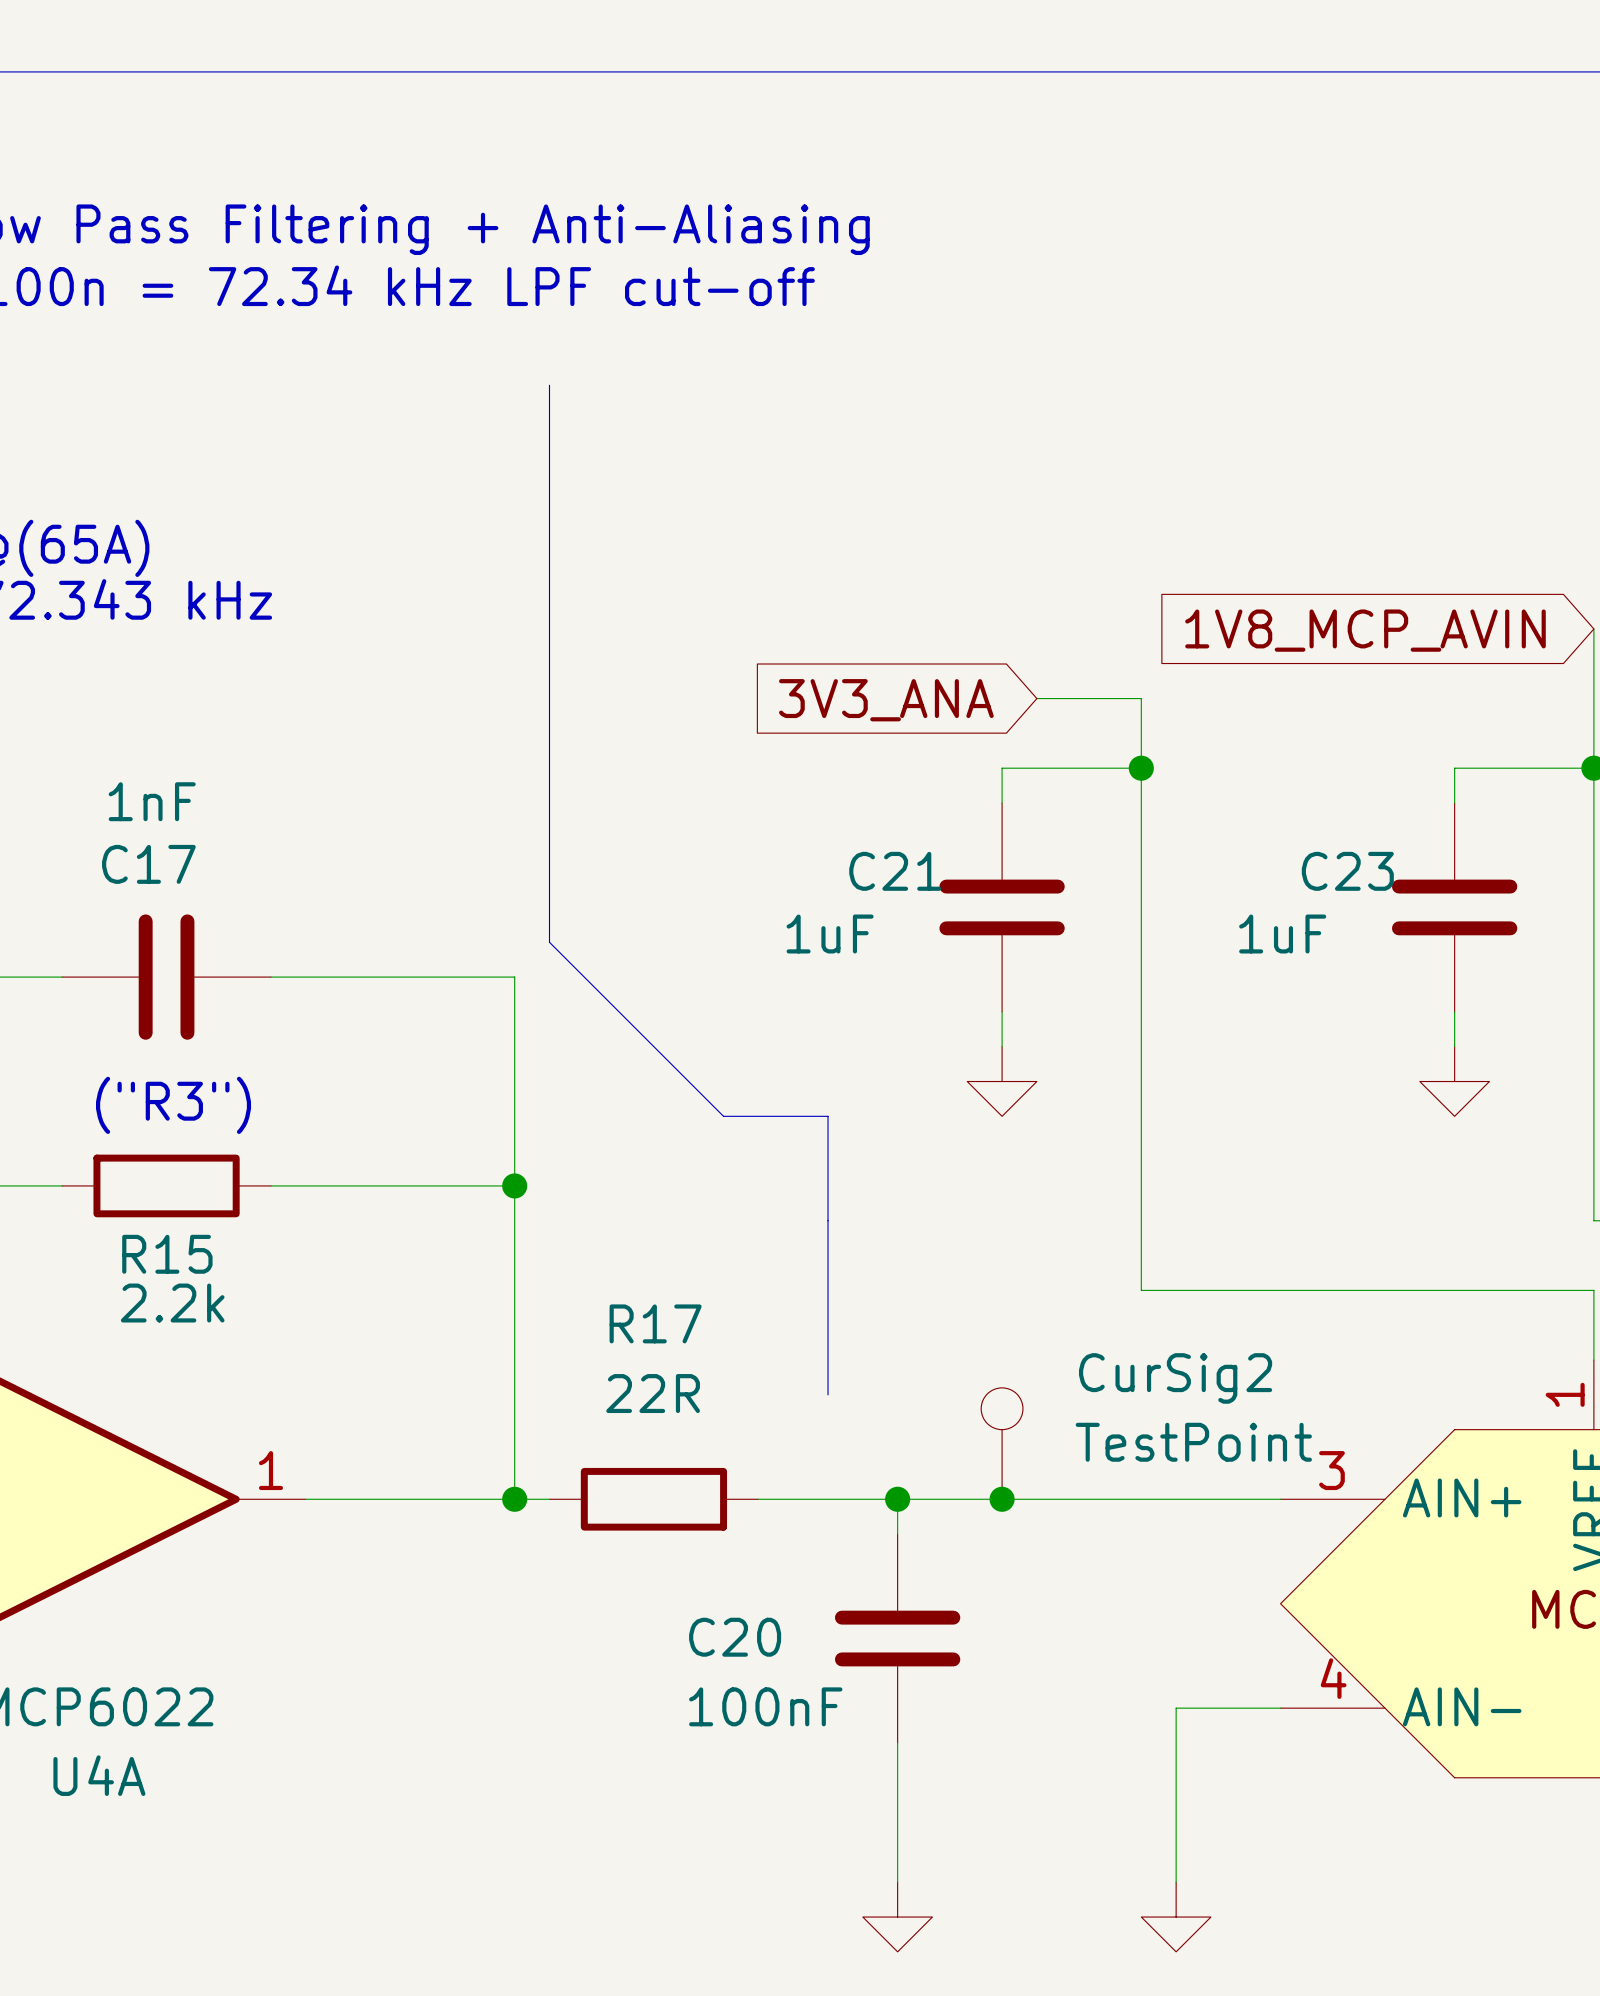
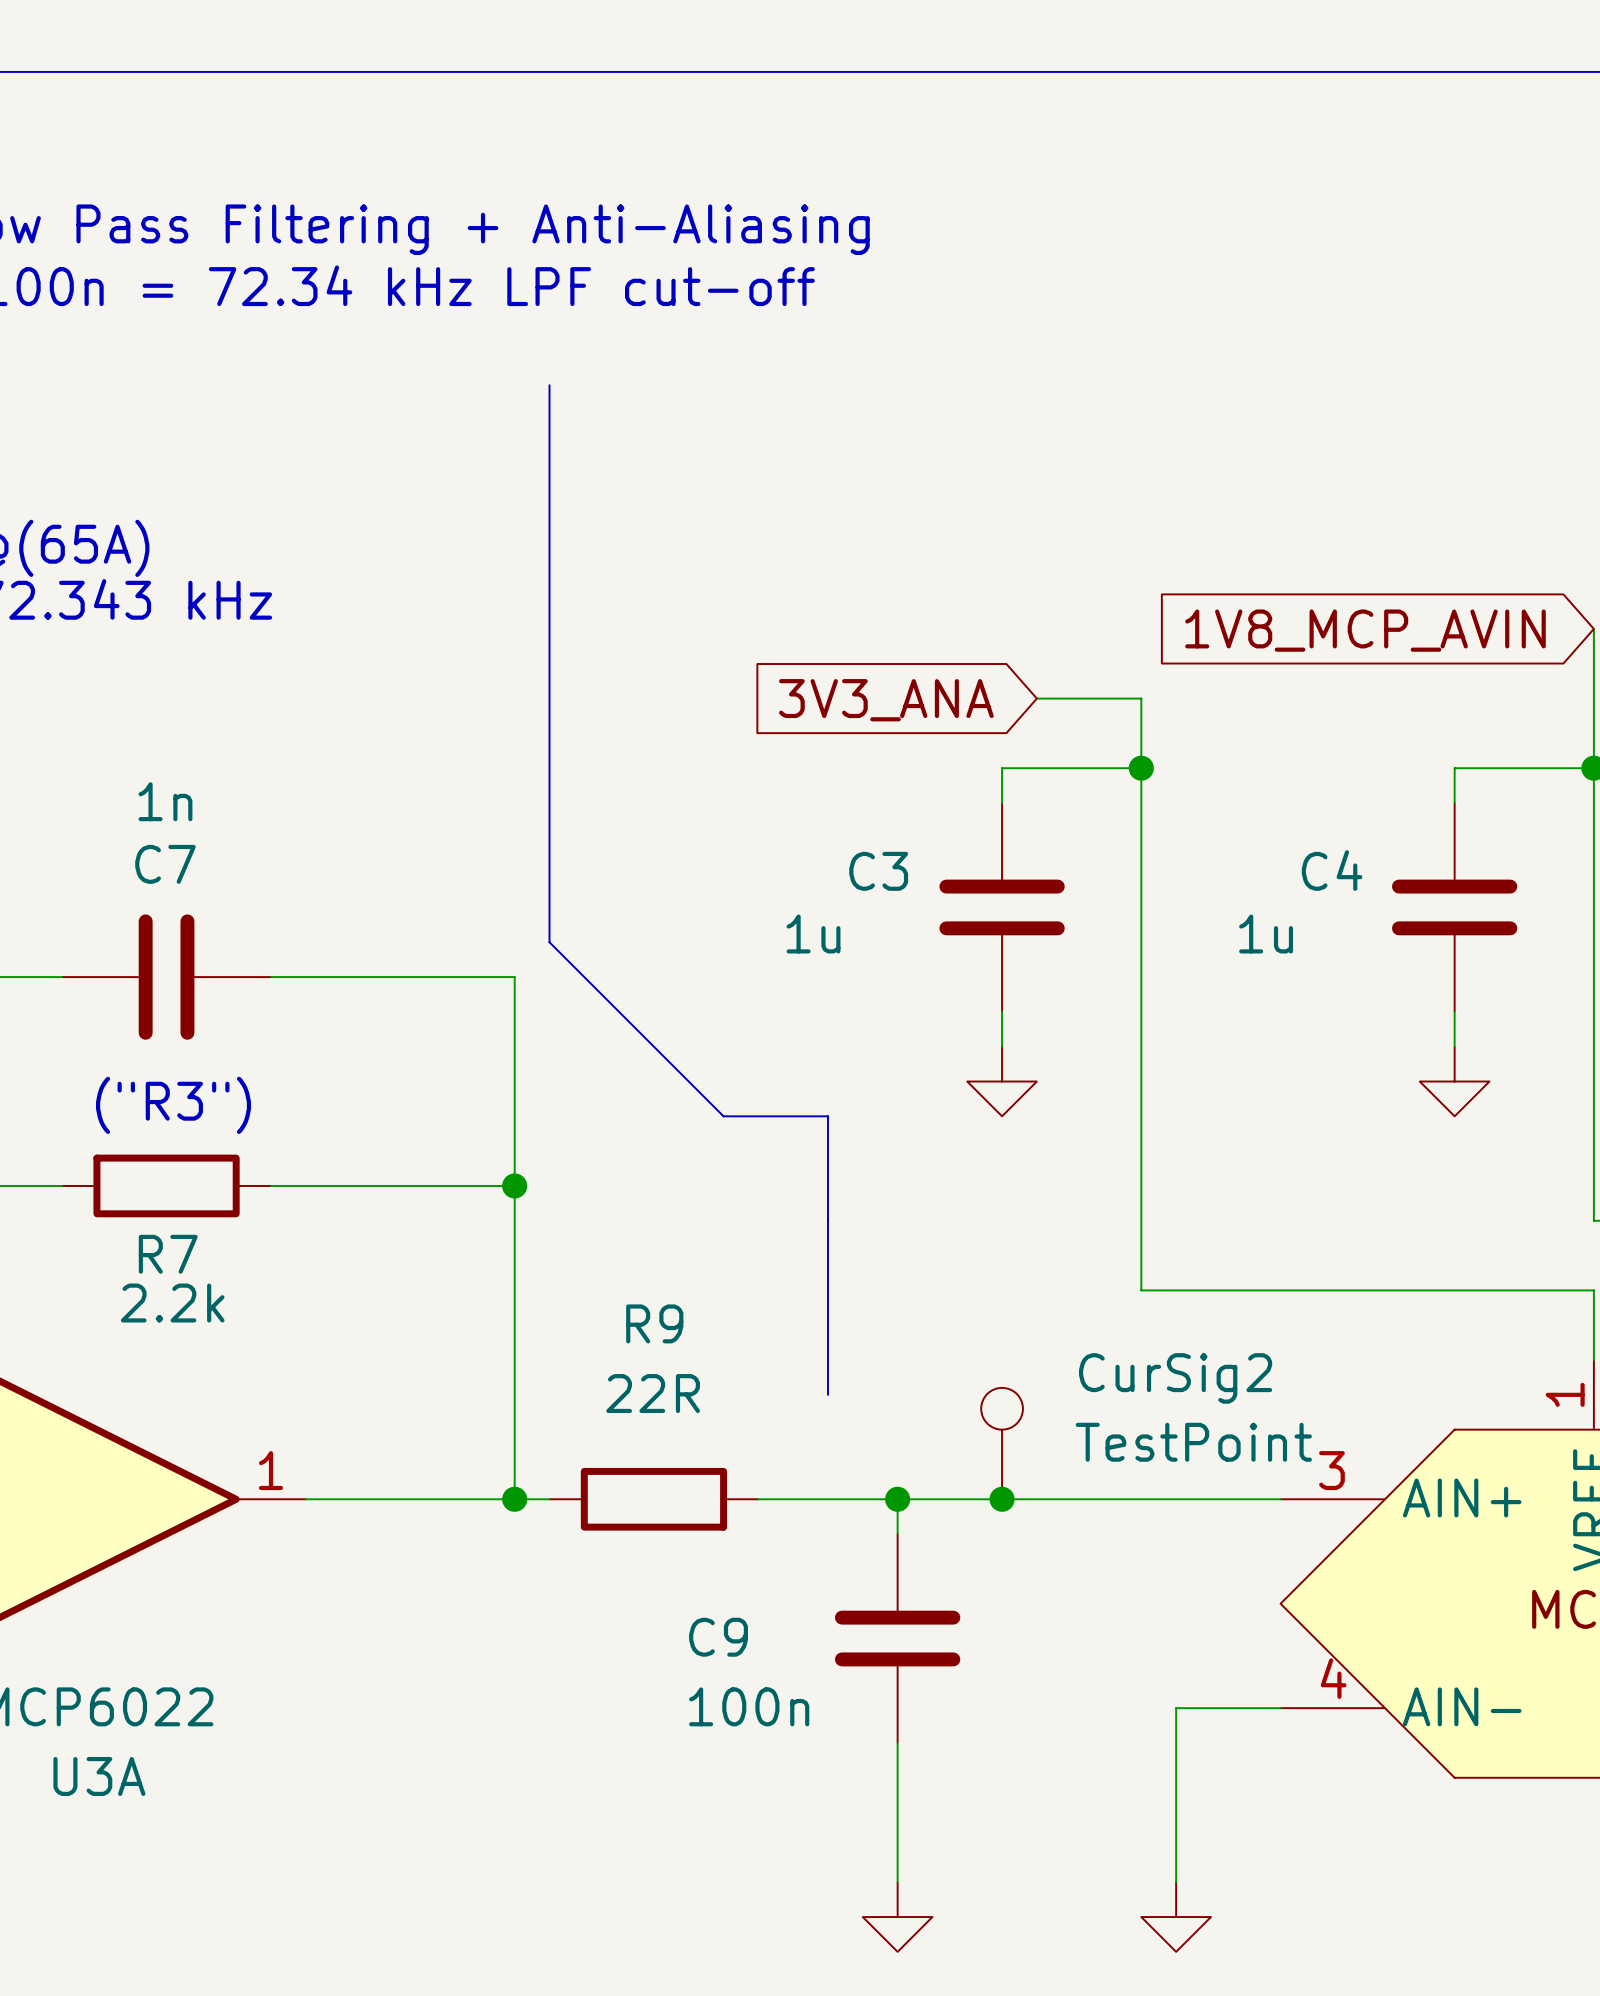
C17 value: 1nF (152, 801) -> 1n (165, 801)
C17 name: C17 (148, 864) -> C7 (165, 864)
C21 name: C21 (895, 871) -> C3 (878, 871)
C23 name: C23 (1347, 871) -> C4 (1332, 870)
C21 value: 1uF (830, 934) -> 1u (813, 934)
C23 value: 1uF (1282, 934) -> 1u (1266, 934)
R15 name: R15 (167, 1254) -> R7 (168, 1254)
R17 name: R17 (655, 1323) -> R9 (654, 1323)
C20 name: C20 (735, 1637) -> C9 (718, 1637)
C20 value: 100nF (765, 1706) -> 100n (749, 1706)
U4A name: U4A (99, 1775) -> U3A (99, 1776)

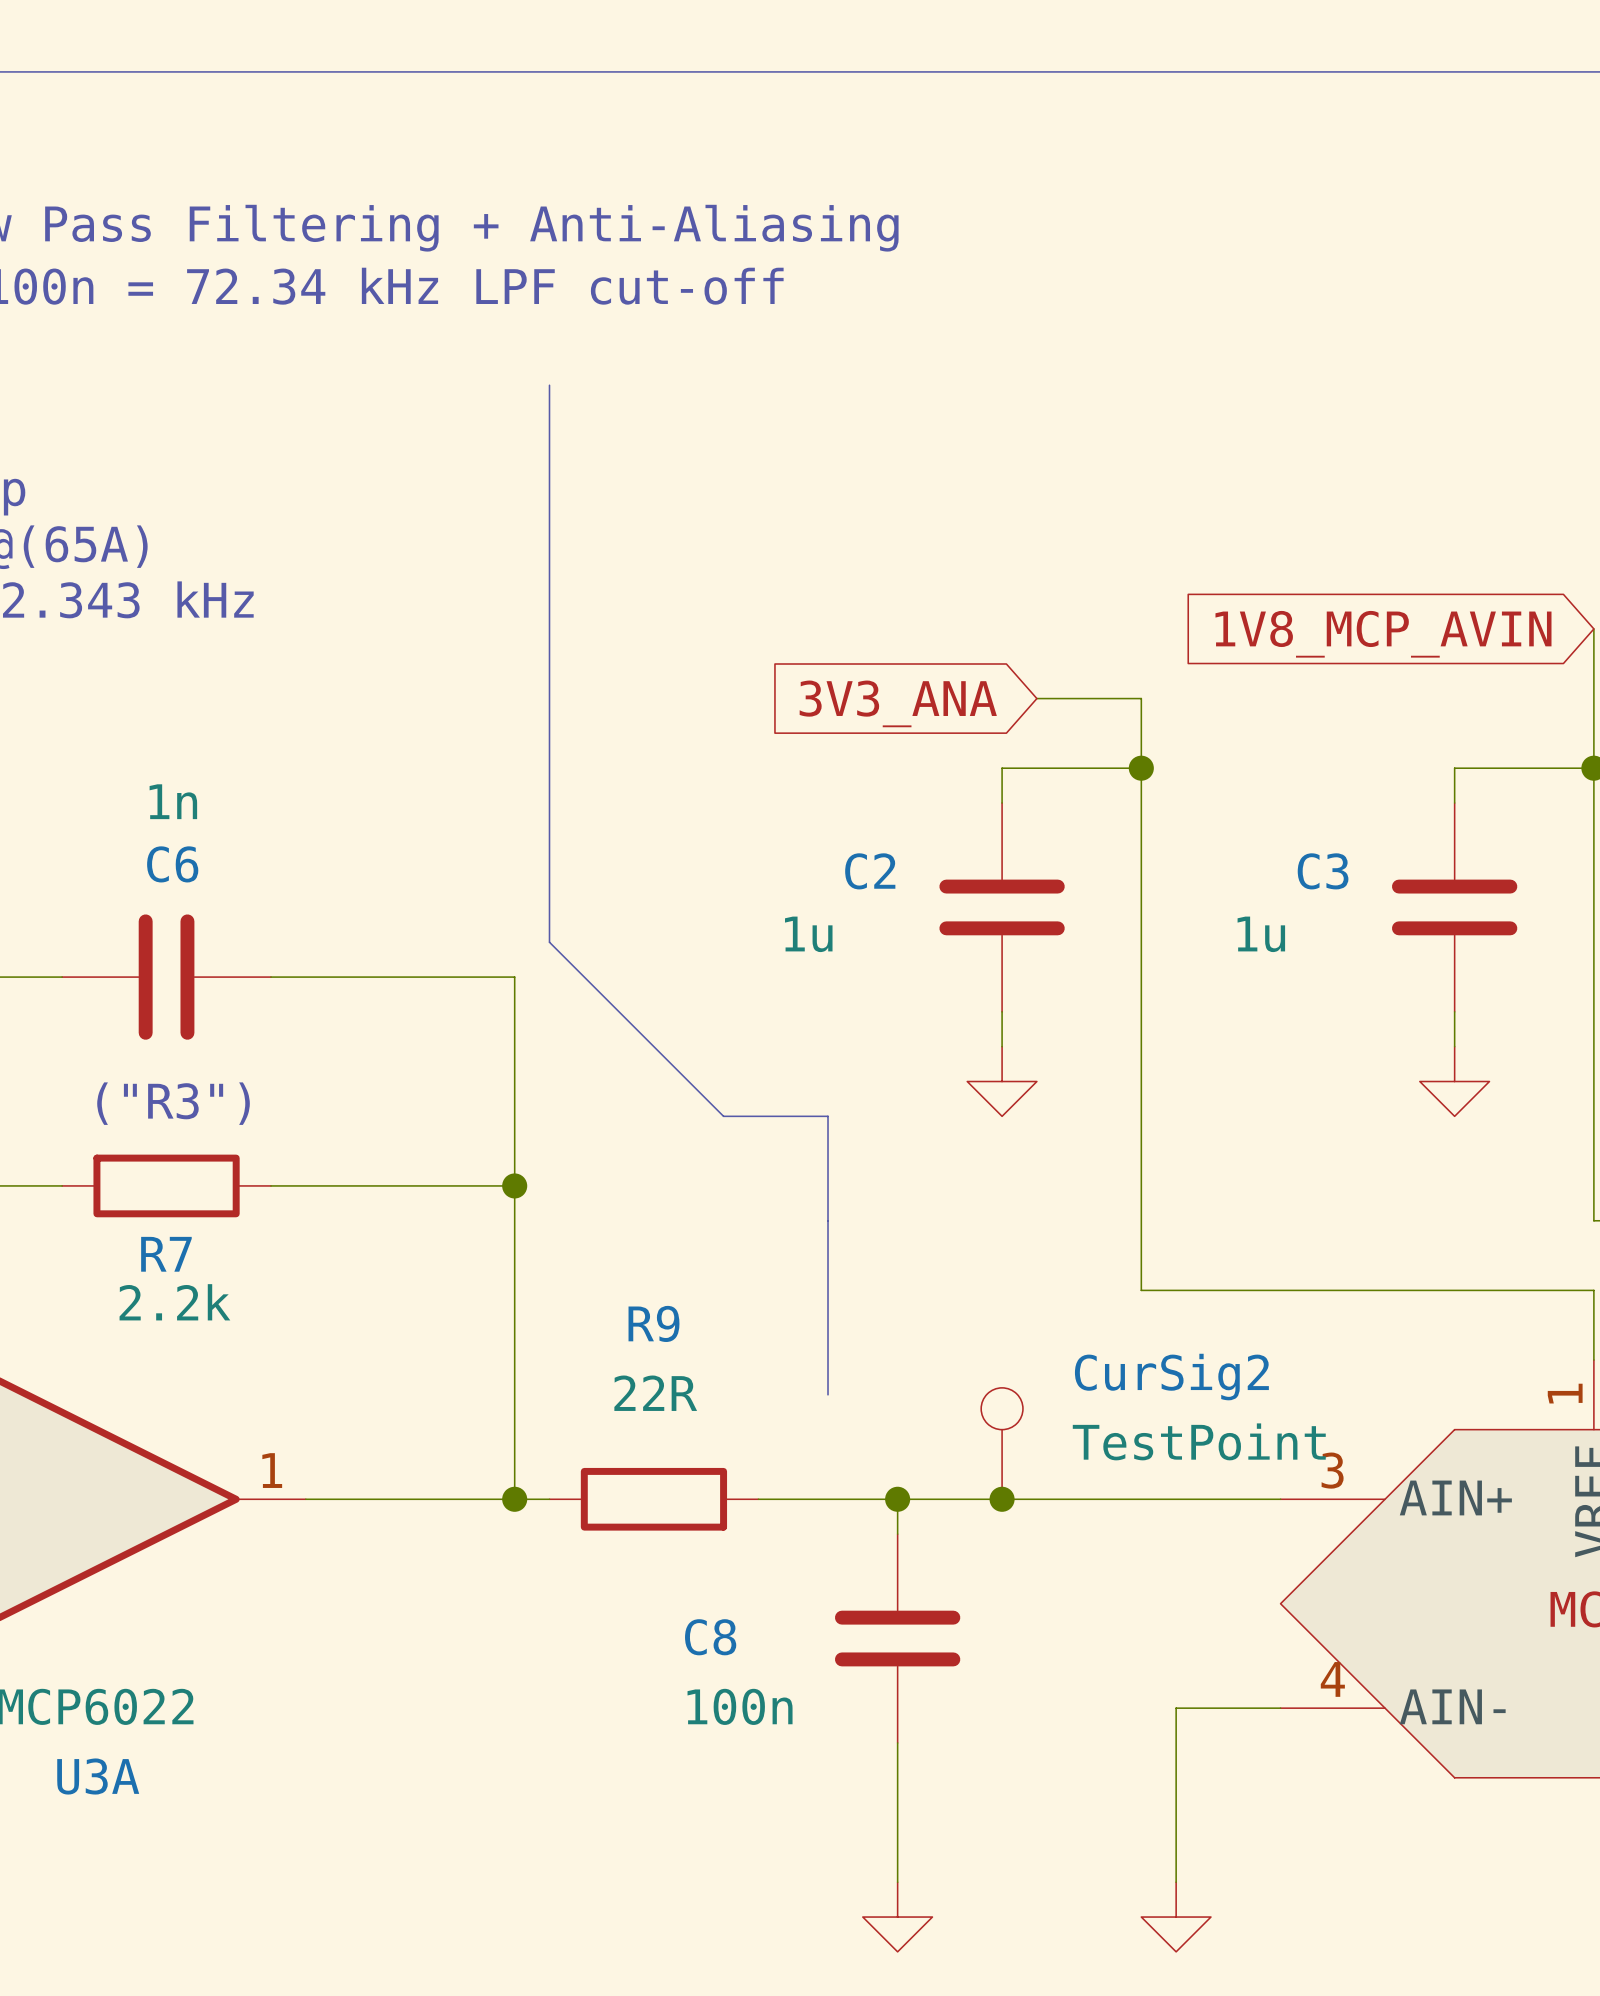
C7 name: C7 (165, 864) -> C6 (172, 864)
C4 name: C4 (1332, 870) -> C3 (1323, 871)
C3 name: C3 (878, 871) -> C2 (870, 871)
C9 name: C9 (718, 1637) -> C8 (710, 1637)

